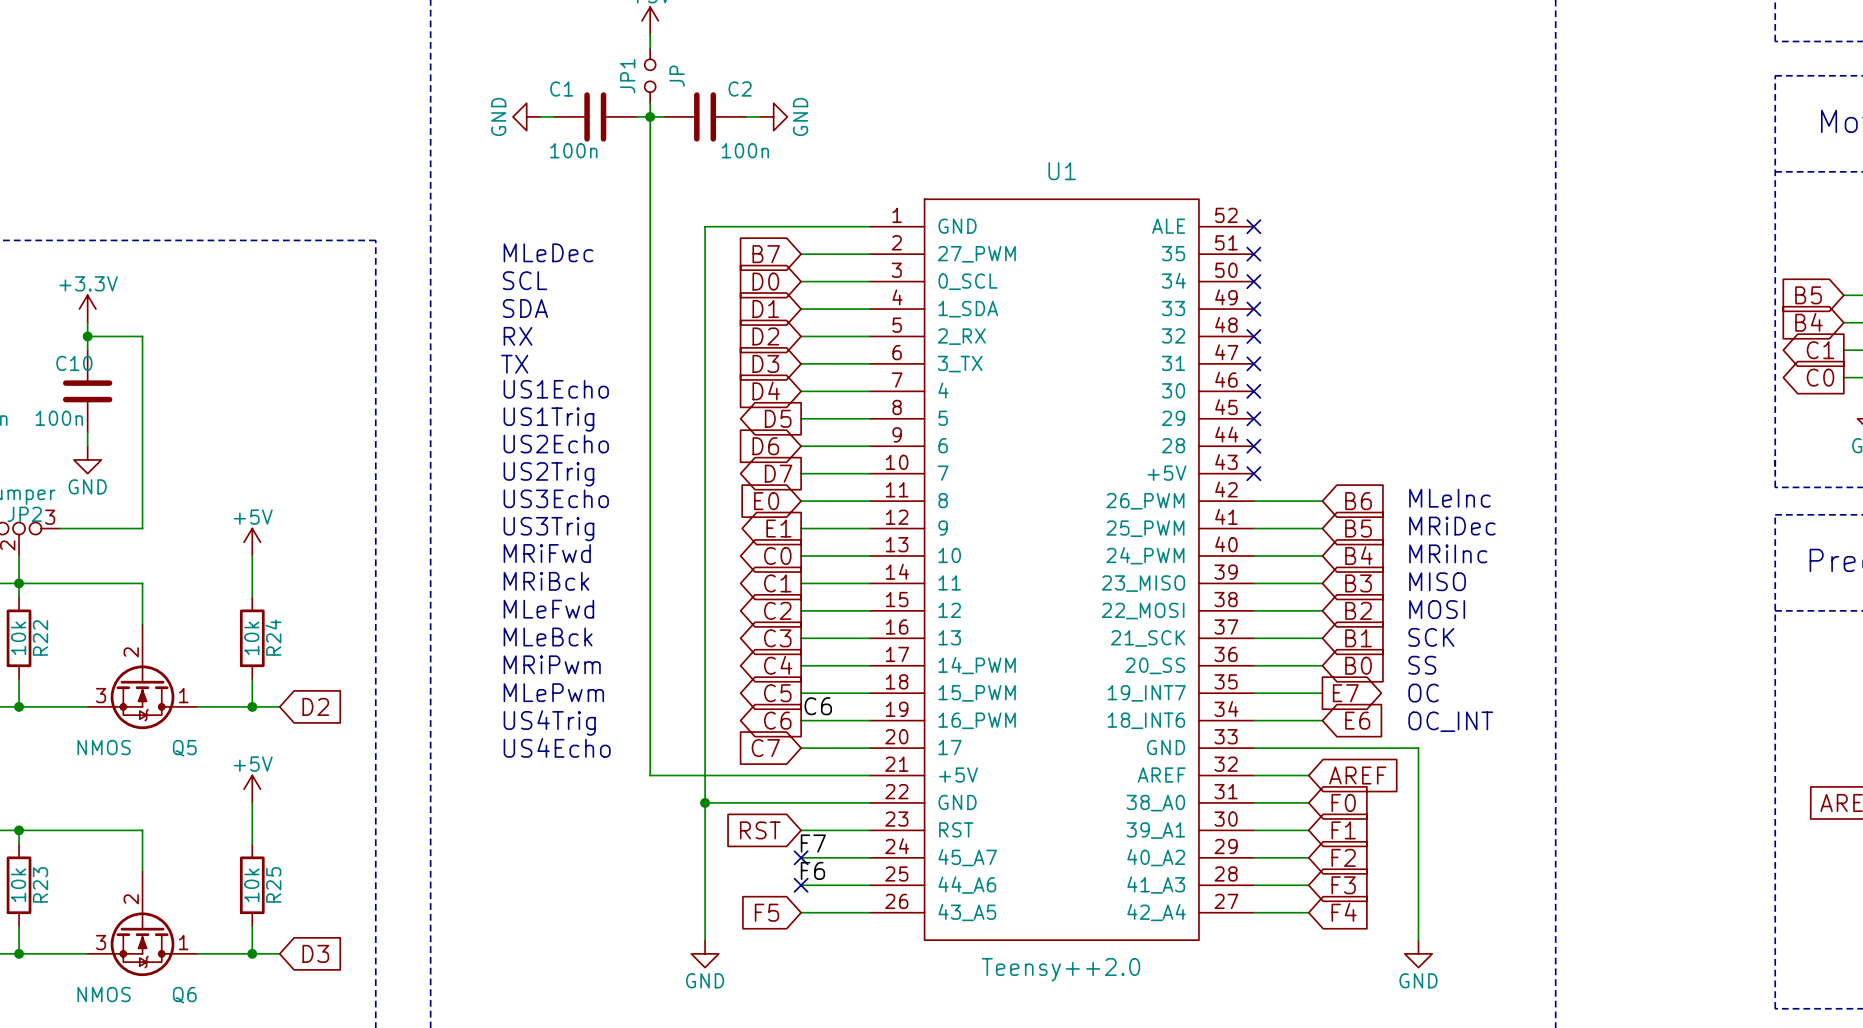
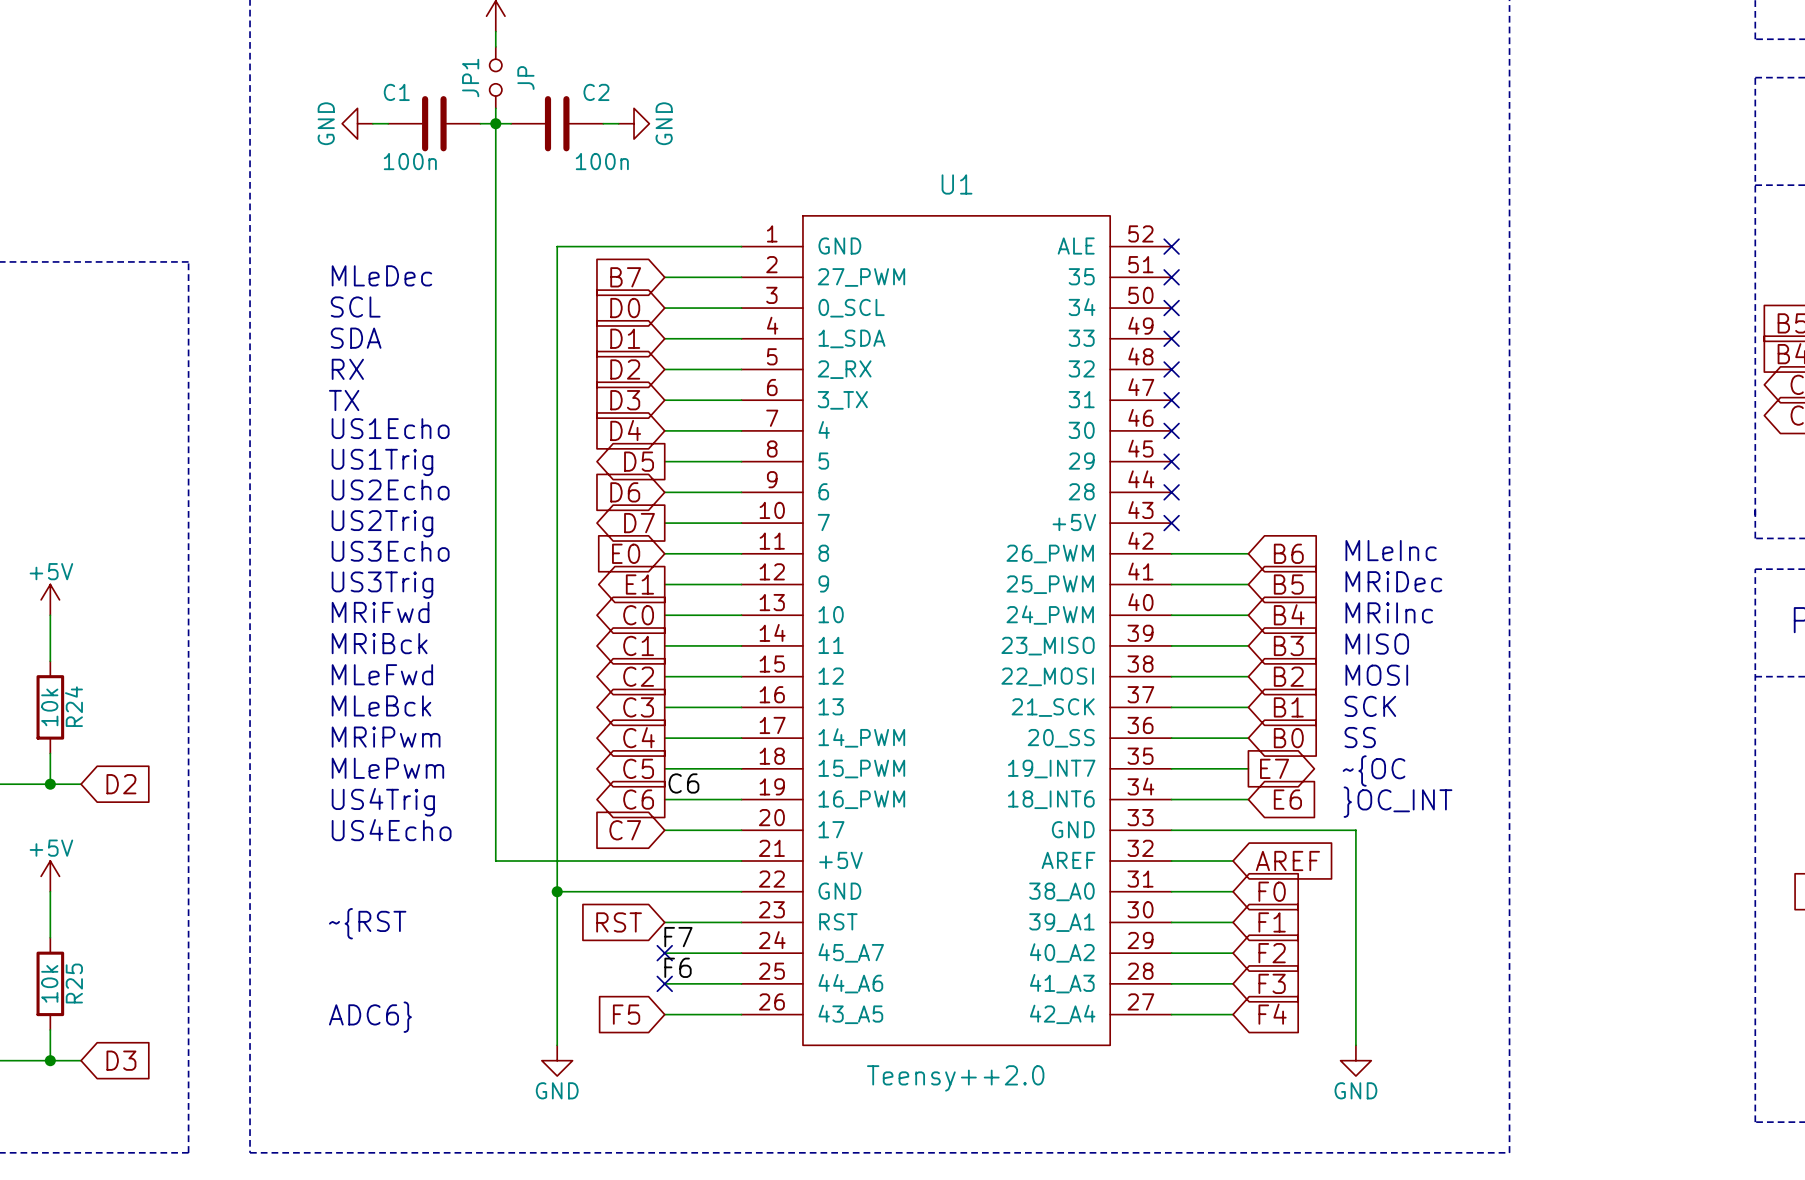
text: OC (1423, 693) -> ~{OC (1374, 770)
text: OC_INT (1450, 721) -> }OC_INT (1398, 802)
text: none -> ~{RST (367, 923)
text: none -> ADC6} (370, 1017)

